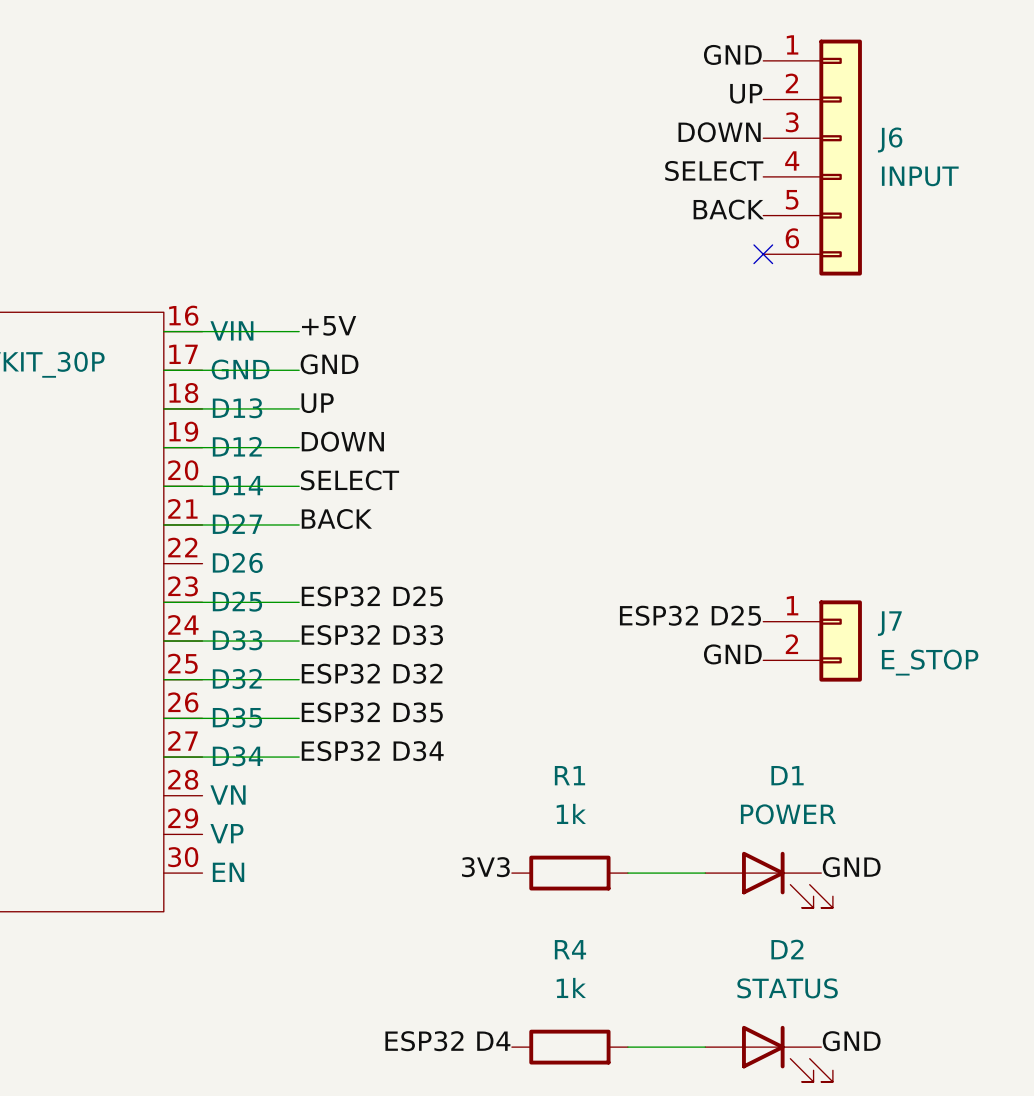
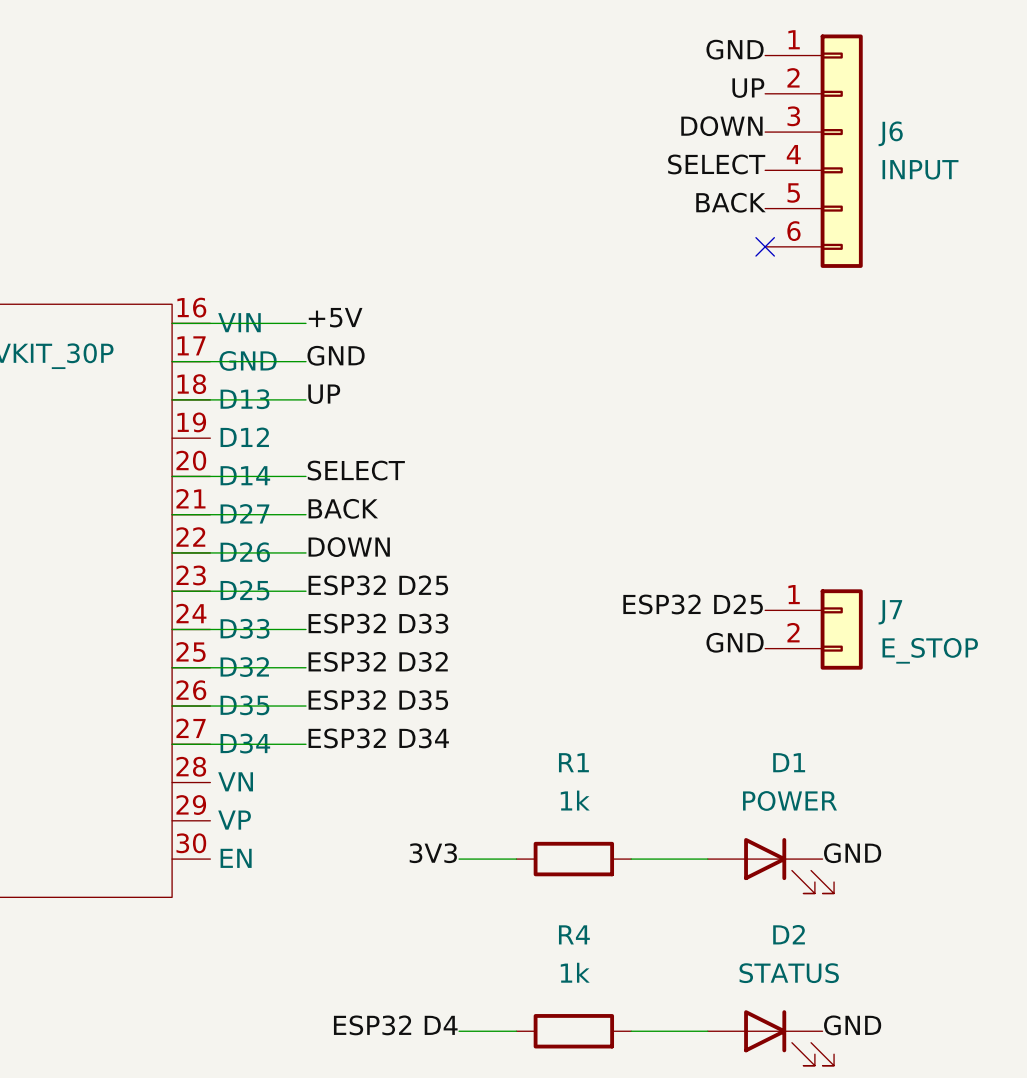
label position: DOWN (342, 441) -> DOWN (349, 547)
wire: (163, 447) (299, 447) -> (172, 552) (306, 552)
label position: 3V3 (485, 867) -> 3V3 (433, 853)
wire: none -> (459, 859) (516, 859)
label position: ESP32 D4 (447, 1041) -> ESP32 D4 (395, 1025)
wire: none -> (459, 1031) (516, 1031)

